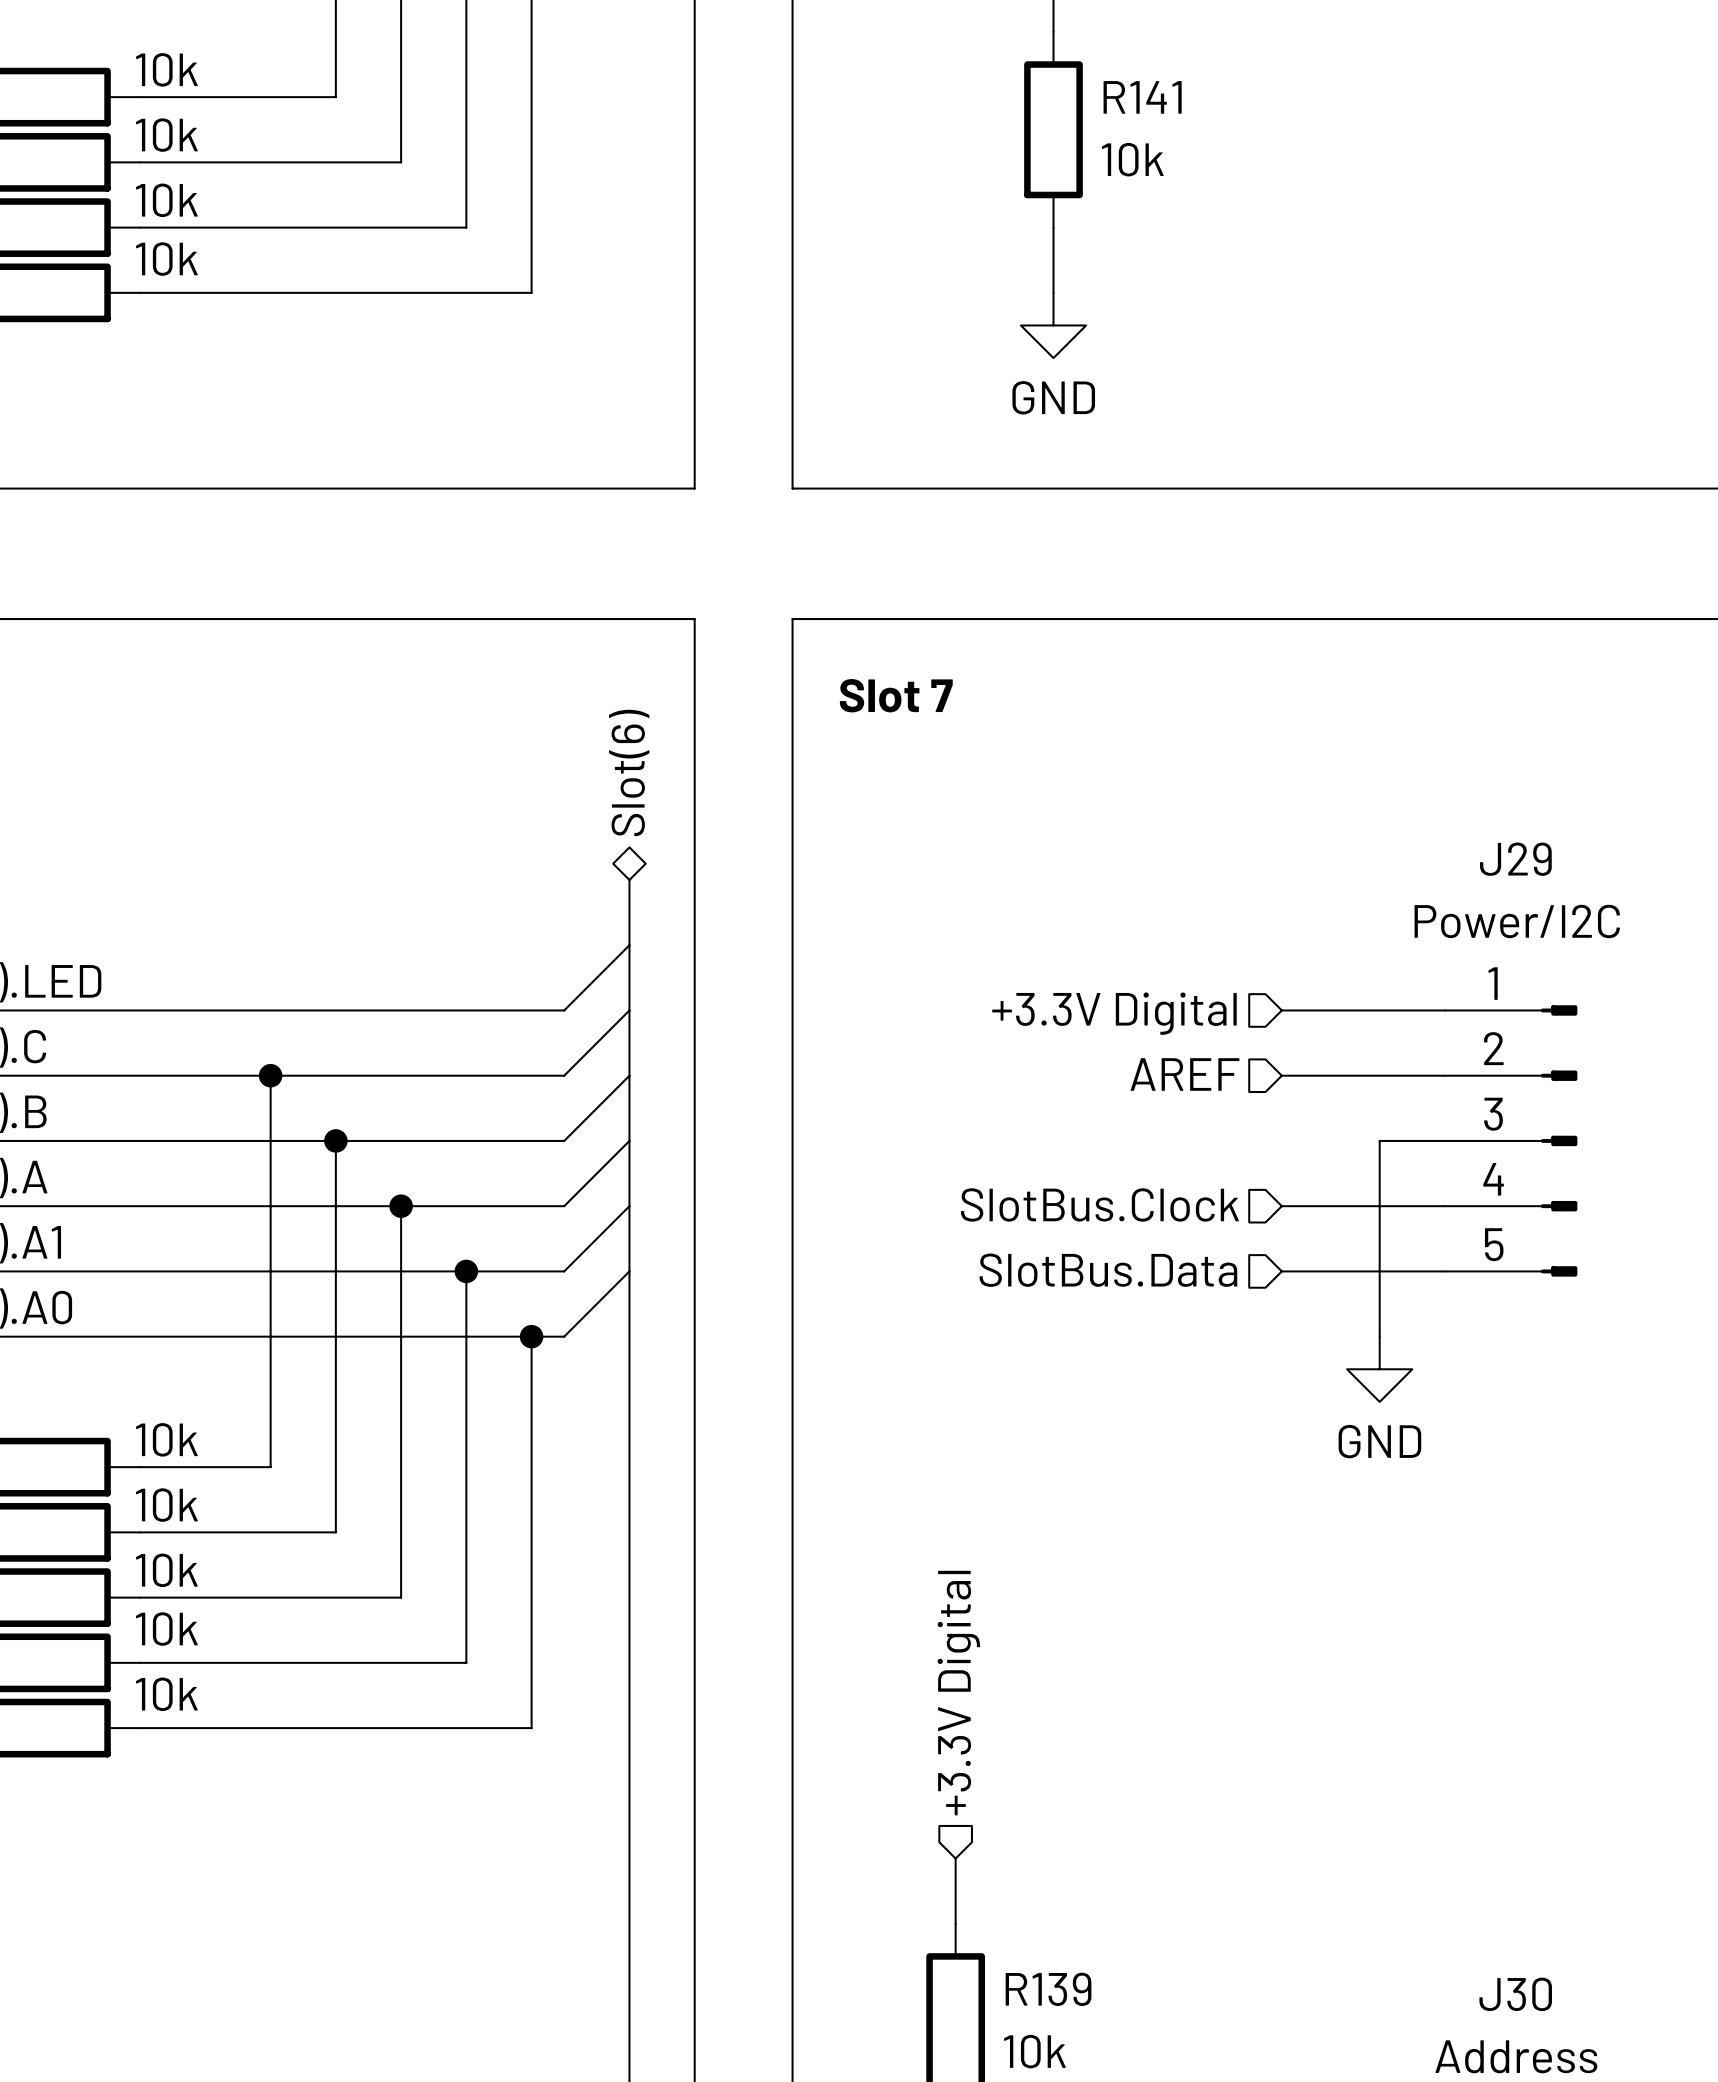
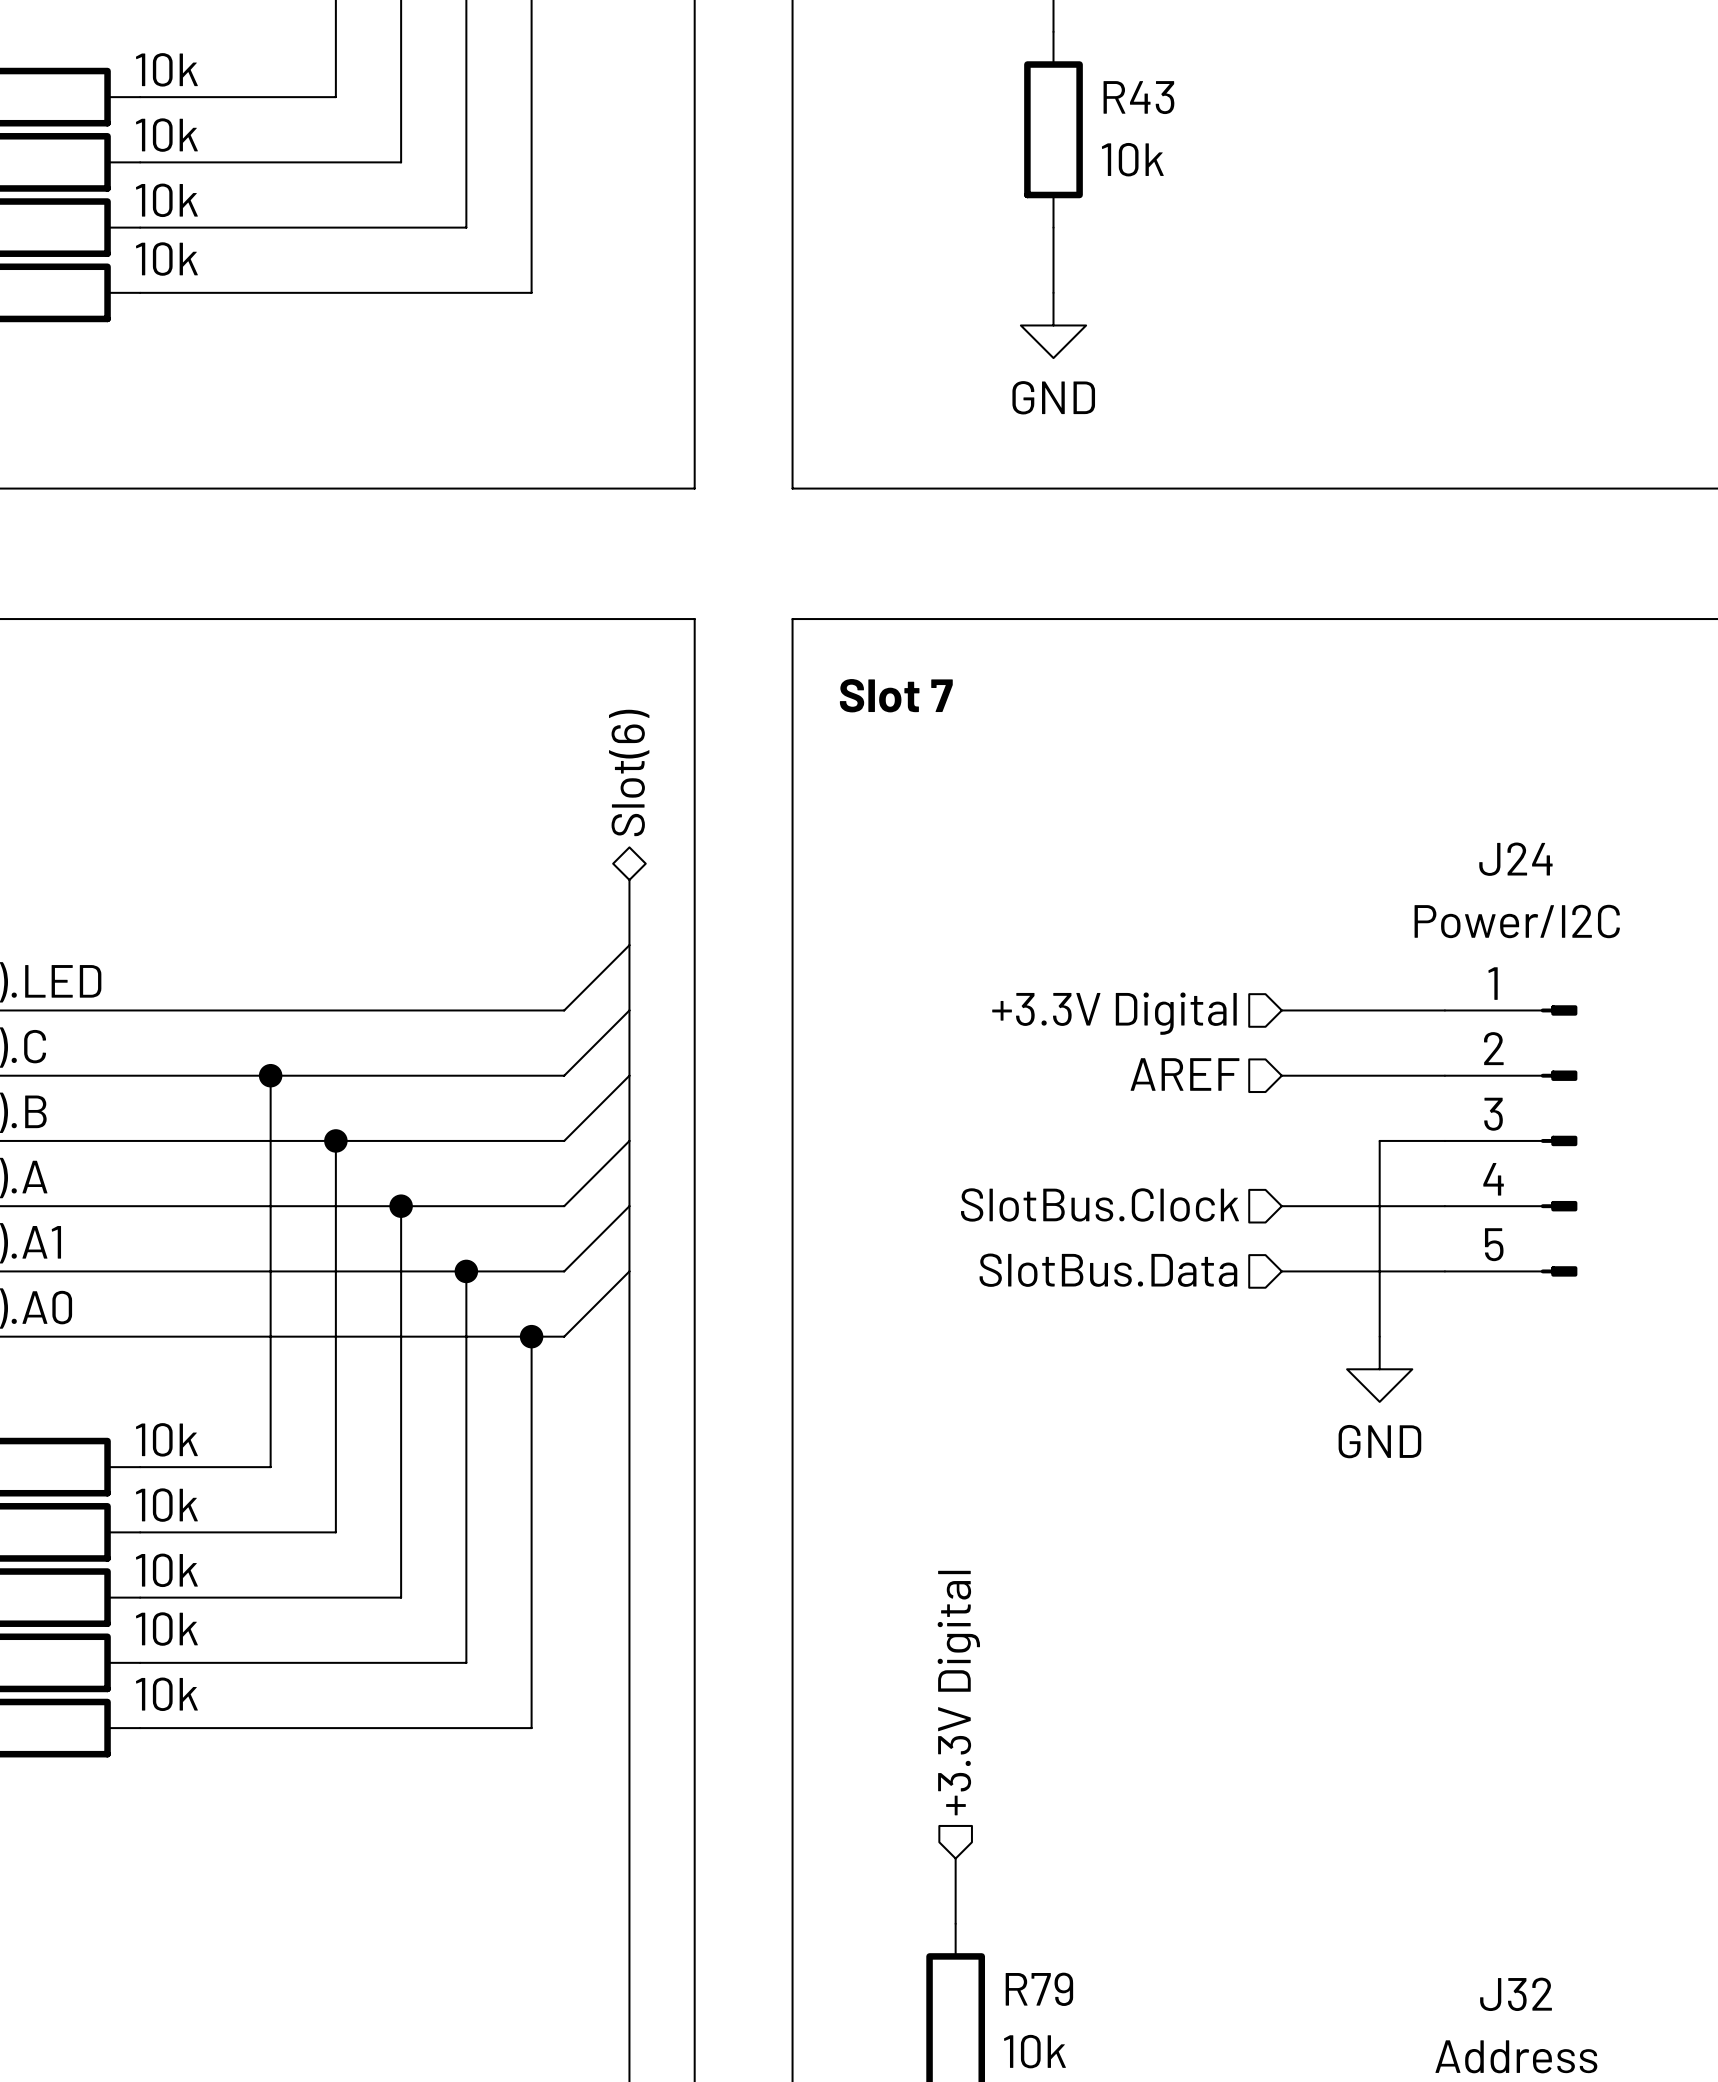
R141 name: R141 (1142, 97) -> R43 (1138, 97)
J29 name: J29 (1515, 859) -> J24 (1515, 859)
R139 name: R139 (1048, 1989) -> R79 (1039, 1989)
J30 name: J30 (1515, 1994) -> J32 (1516, 1994)

